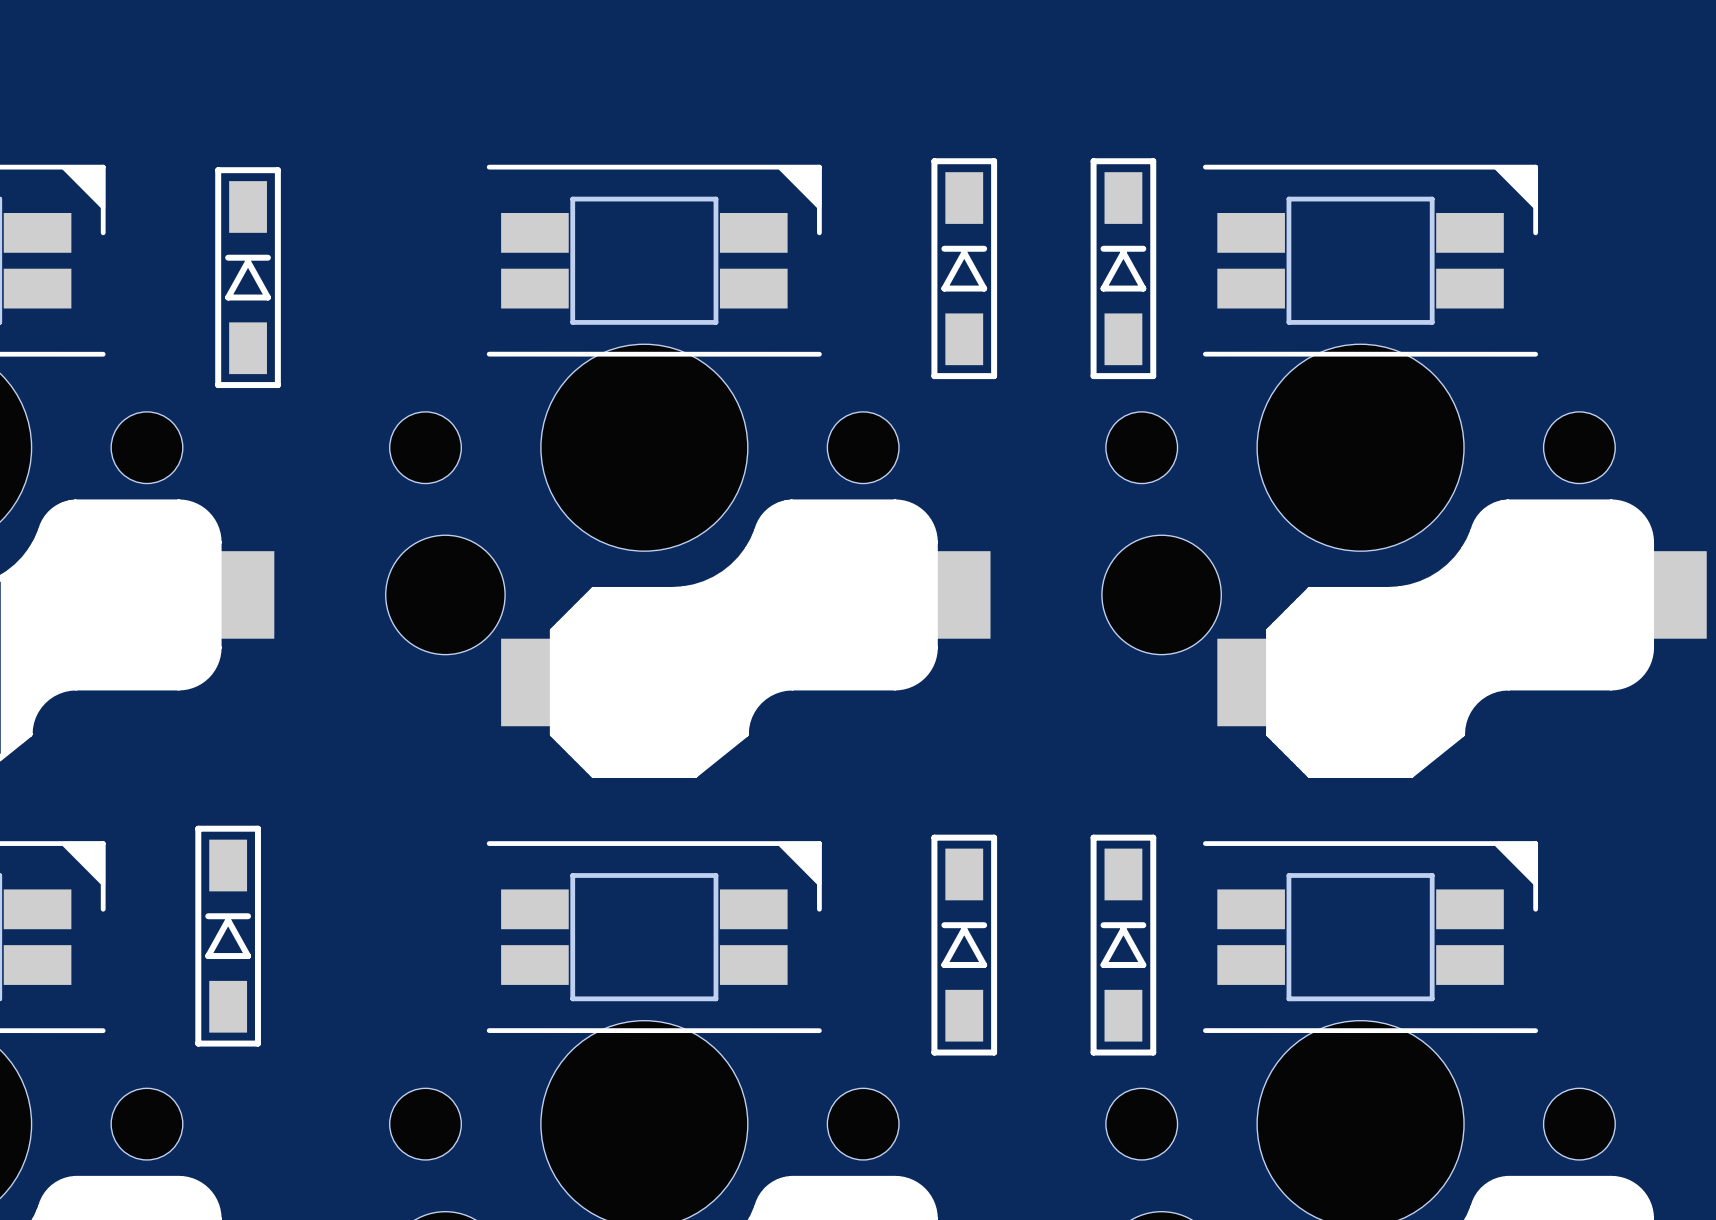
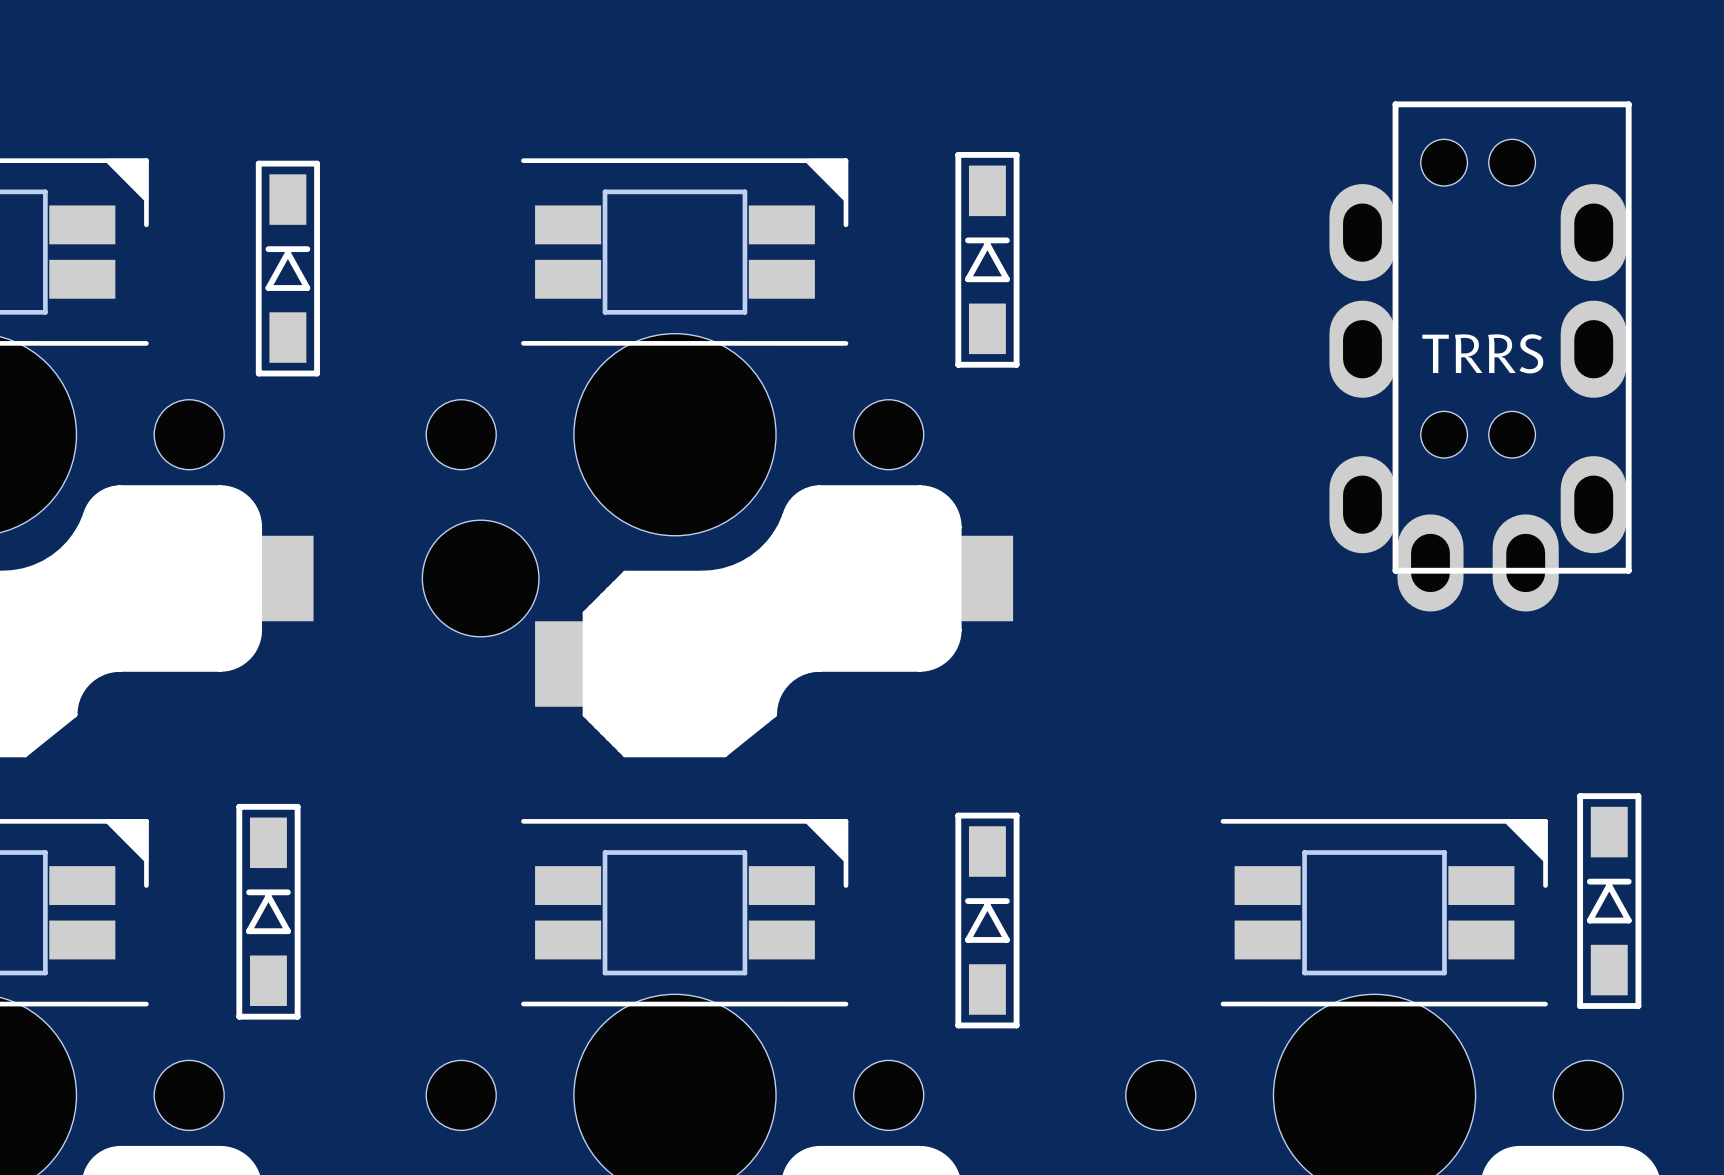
part: (1123, 268) -> none
part: none -> (1480, 356)
part: (1404, 471) -> none
part: none -> (1609, 901)
part: (1123, 945) -> none

